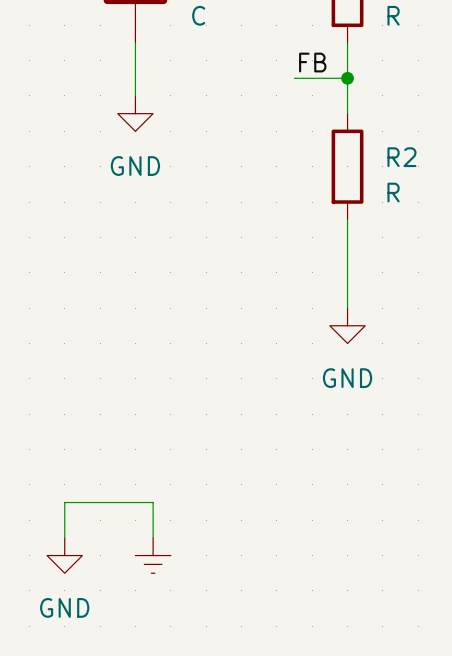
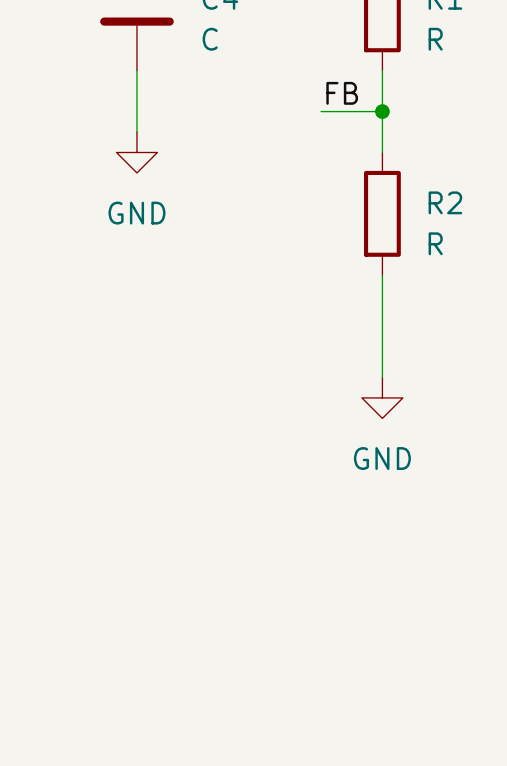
wire: (64, 537) (64, 502) (153, 502) (153, 537) -> none
power symbol: GND (64, 555) -> none
power symbol: (153, 555) -> none

